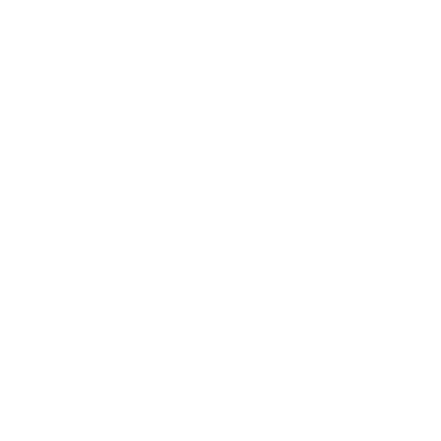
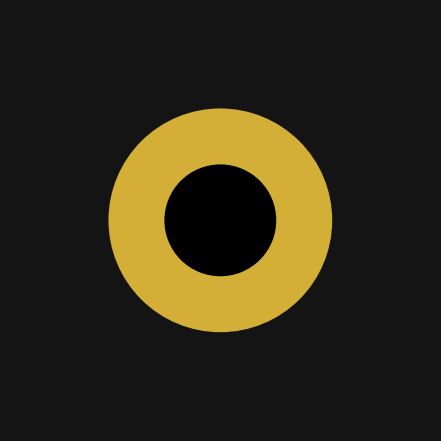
part: none -> (220, 220)

